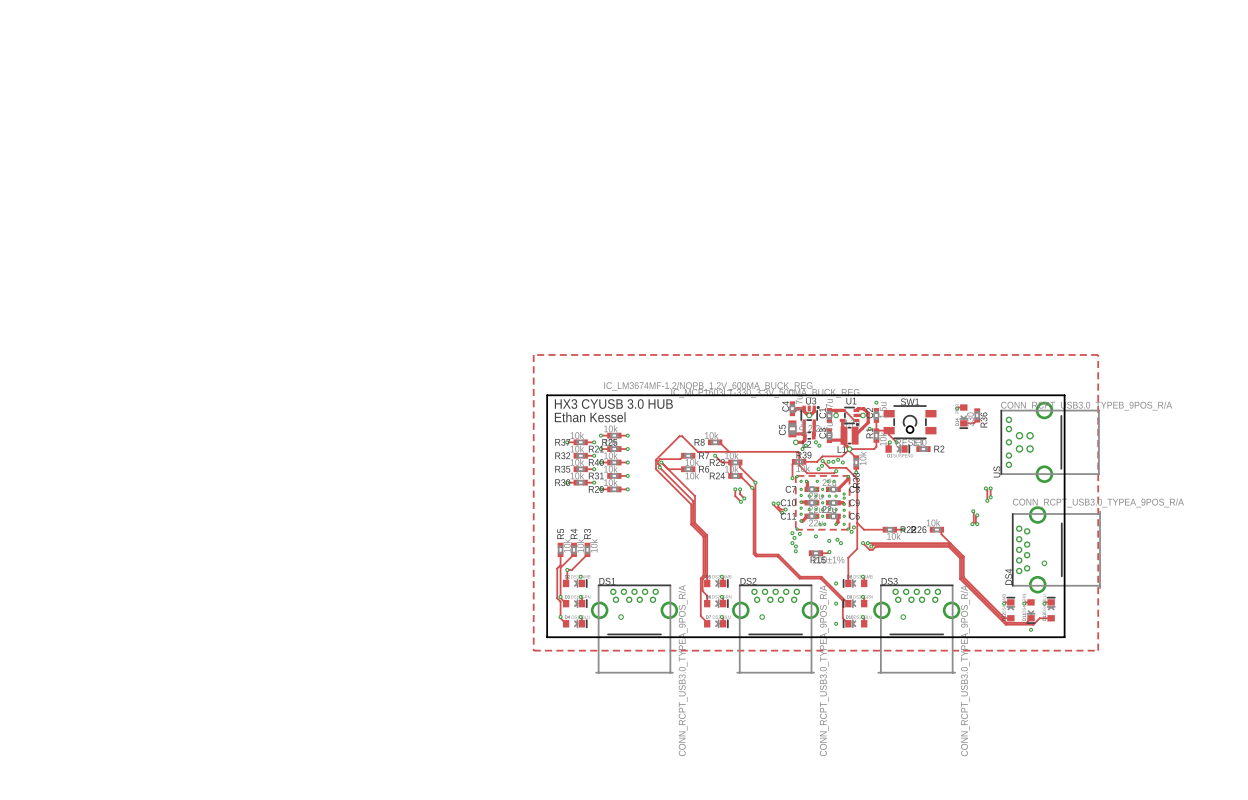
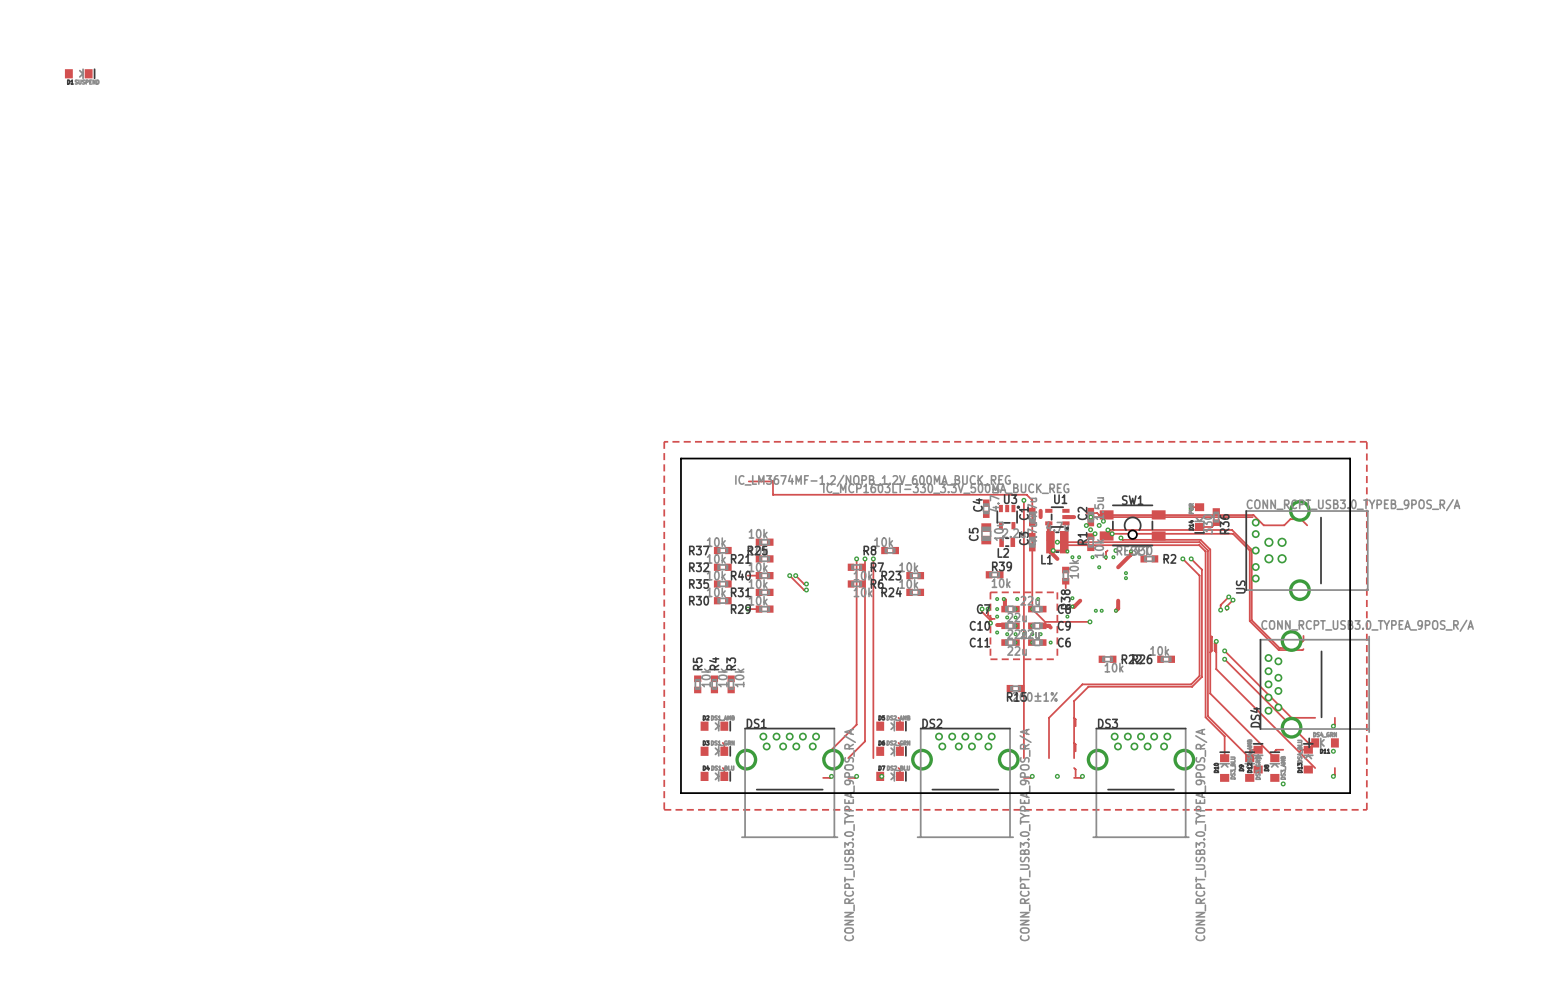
track: none -> (748, 481) (772, 480) (772, 494) (1026, 494) (1032, 500) (1032, 609) (1045, 621) (1089, 621)
board edge: (547, 395) (1064, 395) (1064, 637) -> (680, 491) (680, 458) (1350, 458) (1350, 793) (1325, 793)
track: none -> (1023, 500) (1023, 758)
via: none -> (1023, 500)
via: (876, 402) -> none
text: HX3 CYUSB 3.0 HUB (613, 404) -> none
track: (814, 408) (814, 411) (809, 415) (804, 411) (804, 408) (797, 408) (792, 413) -> none
track: (829, 410) (844, 410) (856, 420) -> none
track: (856, 410) (863, 408) (868, 413) (868, 422) (855, 435) -> none
track: none -> (1086, 513) (1097, 513) (1099, 515) (1253, 515) (1263, 525) (1284, 525) (1290, 519) (1301, 519) (1307, 525)
via: (809, 415) -> none
via: (836, 415) -> none
via: (862, 415) -> none
track: none -> (1090, 517) (1252, 517)
via: none -> (1090, 517)
text: Ethan Kessel (590, 417) -> none
via: none -> (1103, 521)
track: (876, 419) (876, 431) (889, 430) (889, 434) (896, 442) -> none
track: (804, 422) (804, 435) -> none
track: (814, 422) (813, 435) -> none
via: none -> (1086, 525)
via: none -> (1099, 525)
via: none -> (1090, 529)
track: none -> (1107, 529) (1232, 529) (1251, 549) (1251, 620) (1279, 648) (1295, 648) (1303, 640) (1303, 635)
via: none -> (1107, 529)
via: (869, 428) -> none
via: none -> (1095, 533)
track: none -> (1112, 533) (1233, 533) (1249, 550) (1249, 621) (1278, 650) (1303, 649)
via: none -> (1112, 533)
track: none -> (1120, 538) (1122, 539) (1200, 539) (1210, 549) (1210, 693) (1274, 758)
via: none -> (1120, 538)
track: (792, 433) (804, 435) (802, 442) (795, 442) -> none
track: (600, 435) (609, 435) -> none
via: (600, 435) -> none
track: (618, 435) (627, 435) -> none
via: (627, 435) -> none
track: none -> (1057, 542) (1199, 542) (1207, 550) (1207, 716) (1249, 758)
via: none -> (1057, 542)
track: (829, 440) (841, 440) (843, 442) -> none
track: (876, 440) (876, 446) (874, 449) (849, 449) -> none
track: (567, 442) (576, 442) -> none
via: (567, 442) -> none
track: (585, 442) (594, 442) -> none
via: (594, 442) -> none
track: (719, 442) (728, 451) -> none
via: (795, 442) -> none
via: (815, 442) -> none
track: none -> (1053, 550) (1060, 550) (1065, 545) (1199, 545) (1205, 551) (1205, 717) (1224, 736) (1224, 758)
via: none -> (1053, 550)
via: (889, 442) -> none
via: none -> (1067, 551)
via: none -> (1130, 551)
via: (805, 445) -> none
via: (819, 445) -> none
via: none -> (1072, 557)
via: none -> (1079, 557)
via: none -> (1092, 557)
via: none -> (1105, 557)
via: none -> (1113, 557)
track: (600, 449) (609, 449) -> none
via: (600, 449) -> none
track: (618, 449) (627, 449) -> none
via: (627, 449) -> none
track: none -> (856, 558) (856, 724) (823, 758)
via: none -> (856, 558)
via: none -> (864, 558)
track: none -> (873, 558) (873, 758)
via: none -> (873, 558)
via: (802, 449) -> none
track: (849, 449) (856, 458) -> none
track: (849, 449) (842, 456) (822, 456) (817, 461) (803, 461) -> none
via: (849, 449) -> none
part position: (897, 449) -> (80, 73)
via: none -> (1182, 558)
track: none -> (1191, 558) (1201, 569) (1201, 676) (1192, 686) (1088, 686) (1074, 701) (1074, 758)
via: none -> (1191, 558)
track: (585, 455) (594, 455) -> none
via: (594, 455) -> none
track: (683, 455) (680, 459) (659, 459) (658, 463) (693, 500) (693, 523) (705, 536) (705, 576) (702, 579) (702, 591) (707, 595) (707, 603) -> none
track: (715, 455) (721, 462) (730, 462) (730, 475) -> none
via: (715, 455) -> none
via: none -> (1099, 567)
via: (838, 459) -> none
via: none -> (1125, 573)
track: (794, 461) (792, 463) (792, 478) -> none
track: (822, 461) (829, 467) (846, 467) (857, 478) (857, 548) (848, 557) (848, 583) -> none
via: (822, 461) -> none
via: (828, 461) -> none
via: (833, 461) -> none
via: (600, 462) -> none
track: (618, 462) (627, 462) -> none
via: (627, 462) -> none
track: none -> (789, 575) (804, 589) (806, 589)
via: none -> (789, 575)
track: none -> (795, 575) (806, 584)
via: none -> (795, 575)
track: (661, 462) (694, 496) -> (864, 558) (864, 617)
via: (661, 462) -> none
track: (739, 462) (739, 466) (755, 482) (755, 553) (778, 554) (800, 576) (821, 576) (848, 603) -> none
via: (842, 462) -> none
via: none -> (1125, 578)
via: (822, 465) -> none
via: (659, 467) -> none
track: (585, 469) (594, 469) -> none
via: (594, 469) -> none
via: none -> (806, 584)
track: (668, 469) (683, 469) -> none
via: (818, 469) -> none
track: (836, 471) (834, 473) (807, 473) (799, 465) (797, 451) (697, 451) (682, 436) (679, 436) (656, 459) (656, 469) (691, 504) (691, 524) (703, 536) (700, 616) (707, 623) -> none
via: (836, 471) -> none
via: (856, 472) -> none
via: none -> (806, 589)
track: (618, 475) (627, 475) -> none
via: (627, 475) -> none
track: (739, 475) (753, 489) (753, 554) (756, 556) (777, 556) (799, 578) (820, 578) (842, 600) -> (1182, 558) (1199, 575) (1199, 676) (1191, 684) (1082, 684) (1049, 717) (1049, 747)
via: (797, 476) -> none
track: (848, 476) (848, 479) (837, 489) -> (1130, 551) (1130, 554) (1118, 567)
via: (848, 476) -> none
via: (792, 478) -> none
track: none -> (1228, 596) (1220, 605) (1220, 610)
via: none -> (1228, 596)
via: none -> (1072, 598)
via: (828, 481) -> none
track: (567, 482) (576, 482) -> none
via: (567, 482) -> none
track: (585, 482) (594, 482) -> none
via: (594, 482) -> none
via: (755, 482) -> none
track: none -> (1233, 600) (1226, 606) (1226, 610)
via: none -> (1233, 600)
via: (752, 487) -> none
via: none -> (1072, 606)
track: (985, 488) (987, 500) -> none
track: (990, 488) (990, 497) -> none
via: (990, 488) -> none
track: (618, 489) (627, 489) -> none
via: (627, 489) -> none
track: (735, 489) (735, 496) (740, 501) -> none
via: (735, 489) -> none
track: (740, 489) (740, 494) (744, 498) -> none
via: (740, 489) -> none
track: none -> (982, 609) (990, 623)
via: none -> (982, 609)
track: none -> (988, 609) (988, 615) (994, 618)
via: none -> (988, 609)
via: (822, 489) -> none
via: none -> (1095, 610)
via: none -> (1101, 610)
via: none -> (1115, 610)
via: none -> (1220, 610)
via: (844, 494) -> none
via: none -> (1067, 616)
via: (822, 496) -> none
via: (829, 496) -> none
via: (836, 496) -> none
via: (990, 497) -> none
via: (744, 498) -> none
via: (844, 498) -> none
via: none -> (1089, 621)
via: none -> (990, 623)
via: (987, 500) -> none
via: (740, 501) -> none
via: (801, 502) -> none
via: (822, 502) -> none
track: (773, 503) (782, 512) -> none
via: (773, 503) -> none
track: (778, 503) (780, 509) (785, 509) -> none
via: (778, 503) -> none
via: (844, 504) -> none
via: (785, 509) -> none
via: (844, 510) -> none
via: (973, 511) -> none
via: (782, 512) -> none
via: (801, 514) -> none
track: (807, 516) (801, 520) -> (1080, 600) (1072, 606)
via: (822, 516) -> none
track: (837, 516) (836, 524) -> (1118, 600) (1118, 608) (1115, 610)
track: none -> (1216, 642) (1216, 669) (1315, 768)
via: (801, 520) -> none
track: (694, 522) (707, 535) (707, 583) -> (864, 650) (864, 741) (848, 758)
track: (857, 522) (863, 529) (885, 529) -> none
track: none -> (1224, 650) (1291, 717) (1315, 717)
via: none -> (1224, 650)
via: (819, 524) -> none
via: (824, 524) -> none
via: (836, 524) -> none
via: (844, 524) -> none
via: (972, 524) -> none
via: (977, 524) -> none
via: (853, 527) -> none
via: (797, 529) -> none
via: (848, 529) -> none
track: (894, 529) (903, 529) -> none
via: (903, 529) -> none
track: (941, 529) (941, 534) (963, 556) (963, 577) (1004, 618) (1010, 618) -> none
track: none -> (1224, 659) (1308, 742) (1315, 742)
via: none -> (1224, 659)
via: (851, 531) -> none
via: (792, 533) -> none
via: (799, 533) -> none
via: (815, 536) -> none
via: (794, 537) -> none
via: (837, 539) -> none
via: (829, 540) -> none
via: (792, 543) -> none
via: (840, 543) -> none
track: (862, 543) (869, 549) (875, 546) (948, 546) (960, 558) (960, 578) (1005, 624) (1033, 624) (1039, 618) (1051, 618) -> none
via: (862, 543) -> none
track: (867, 543) (950, 543) -> none
via: (867, 543) -> none
via: (795, 546) -> none
track: (871, 546) (949, 545) (961, 557) (961, 578) (1006, 622) (1026, 622) (1030, 618) -> none
via: (871, 546) -> none
via: (795, 551) -> none
track: (829, 552) (820, 553) -> none
via: (829, 552) -> none
track: (560, 554) (560, 565) (557, 568) (557, 598) (560, 601) (560, 618) (566, 623) -> none
track: (574, 554) (560, 567) (560, 598) (566, 603) -> none
track: (587, 554) (571, 570) (567, 570) (566, 583) -> none
via: (1044, 563) -> none
via: (567, 570) -> none
via: (580, 576) -> none
via: (721, 576) -> none
via: (862, 576) -> none
track: none -> (1334, 717) (1333, 726)
via: (836, 583) -> none
part rotation: 0° (855, 583) -> 90° clockwise (1274, 766)
part position: (855, 583) -> (1274, 766)
via: none -> (1333, 726)
via: (560, 596) -> none
via: (580, 596) -> none
via: (721, 596) -> none
via: (862, 596) -> none
via: (836, 603) -> none
part rotation: 0° (855, 603) -> 90° clockwise (1249, 766)
part position: (855, 603) -> (1249, 766)
via: (1004, 603) -> none
via: (1024, 603) -> none
via: (1044, 603) -> none
via: none -> (1333, 751)
track: (842, 609) (842, 618) (848, 623) -> none
part rotation: 0° (1030, 611) -> 90° clockwise (1323, 742)
part position: (1030, 611) -> (1323, 742)
via: (560, 617) -> none
via: (580, 617) -> none
via: (621, 617) -> none
via: (721, 617) -> none
via: (762, 617) -> none
via: (862, 617) -> none
via: (903, 617) -> none
track: none -> (1334, 768) (1333, 776)
track: none -> (831, 776) (823, 777)
via: none -> (831, 776)
track: none -> (856, 776) (848, 777)
via: none -> (856, 776)
via: none -> (881, 776)
track: none -> (1032, 776) (1023, 777)
via: none -> (1032, 776)
via: (836, 623) -> none
via: none -> (1057, 776)
part rotation: 0° (855, 623) -> 90° clockwise (1224, 766)
part position: (855, 623) -> (1224, 766)
track: none -> (1082, 776) (1074, 777)
via: none -> (1082, 776)
via: none -> (1333, 776)

